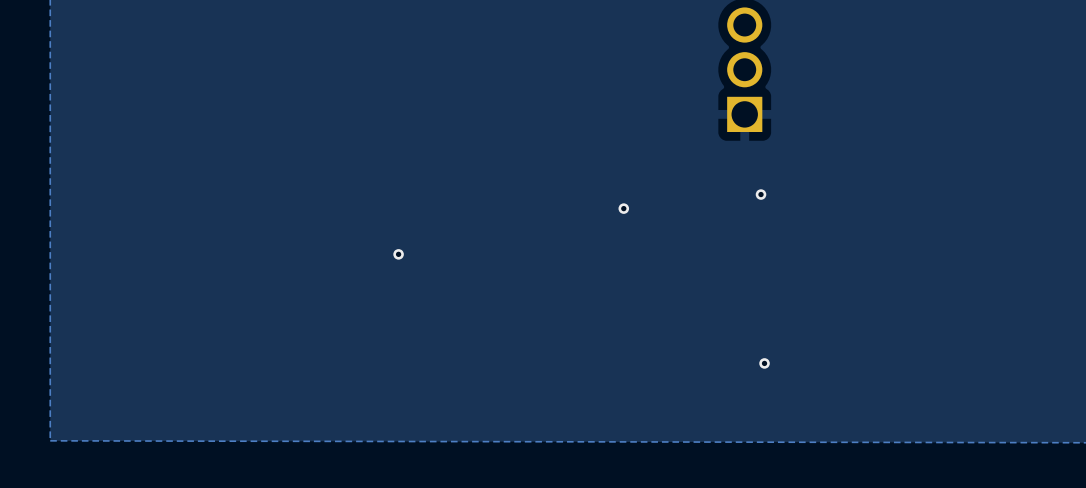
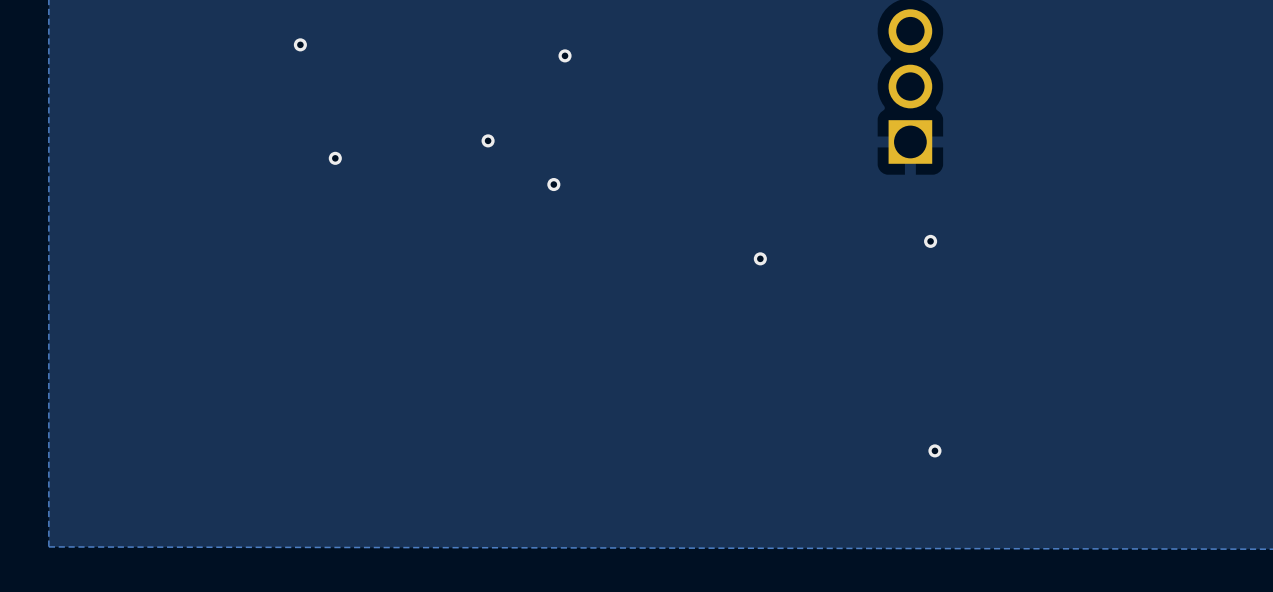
via: none -> (300, 44)
via: none -> (565, 55)
via: none -> (488, 140)
via: none -> (335, 158)
via: none -> (553, 184)
via: (398, 254) -> none

